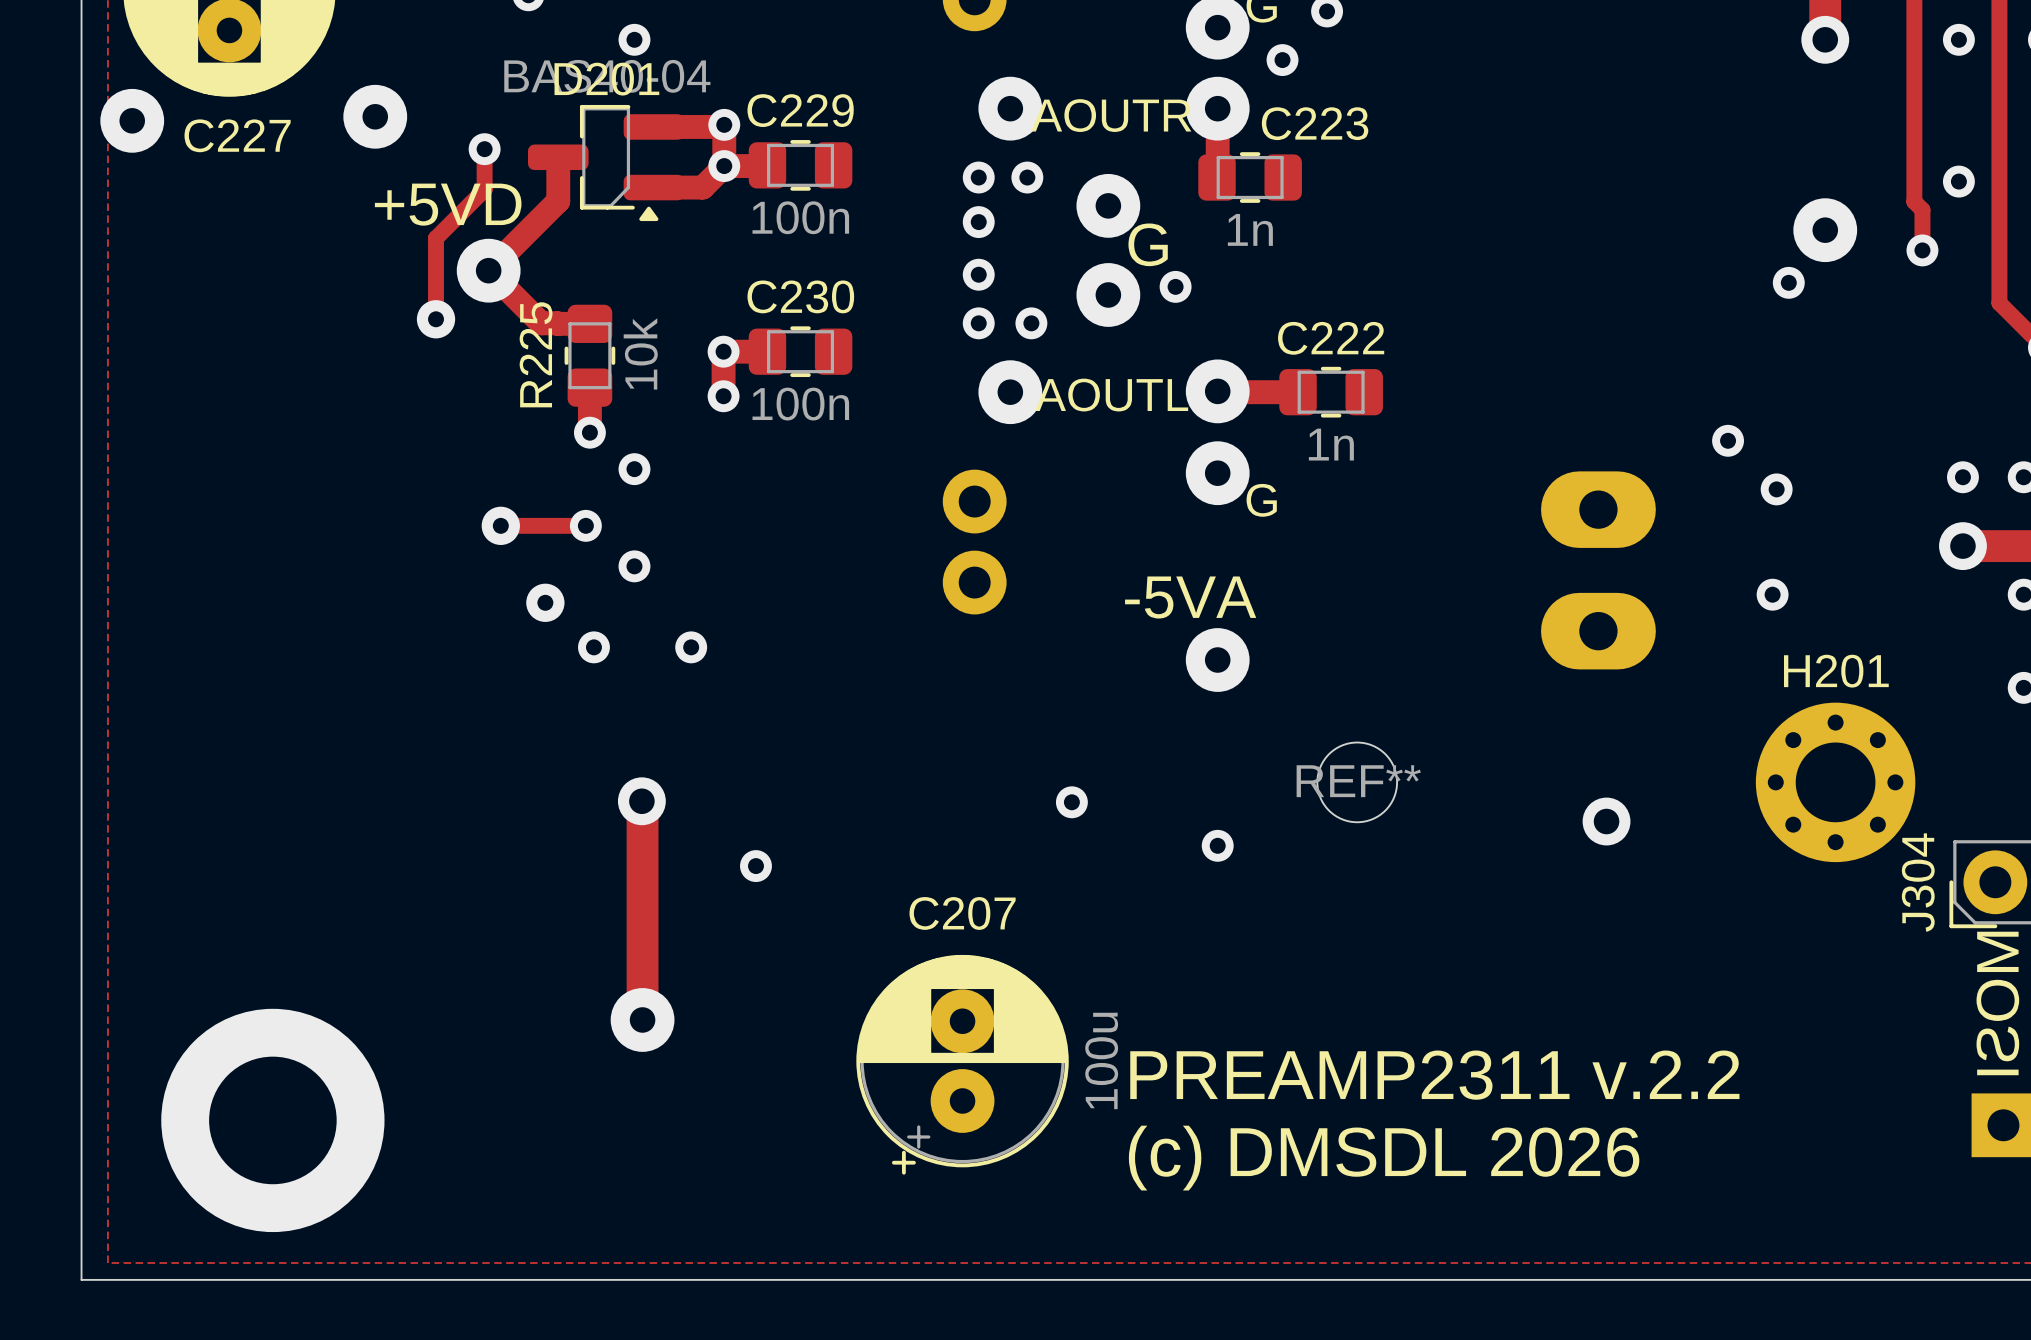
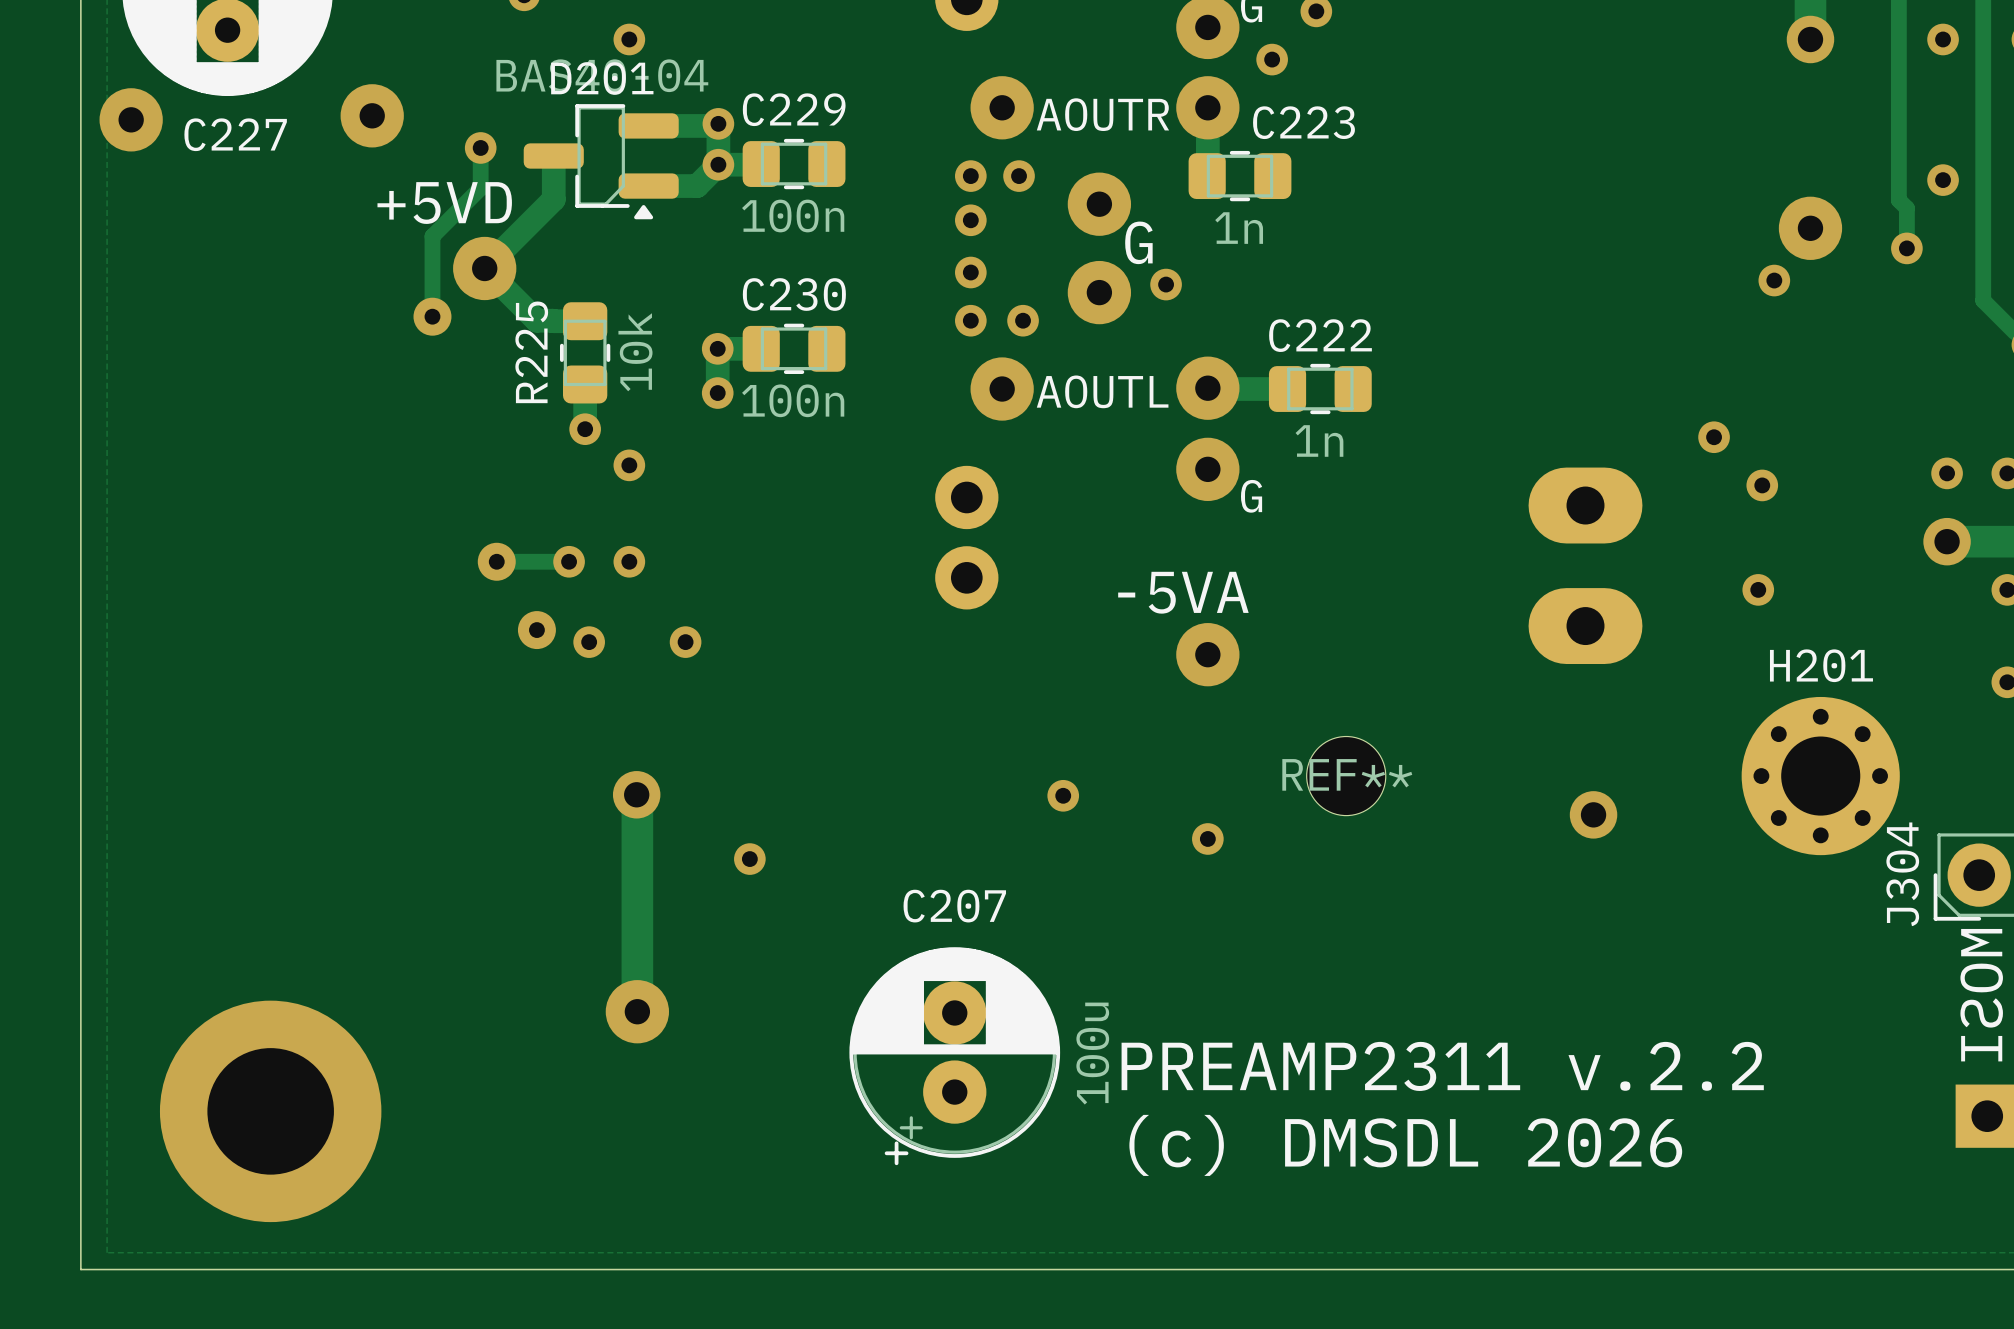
track: (500, 525) (585, 525) -> none
via: (500, 525) -> none
via position: (585, 525) -> (569, 561)
track: none -> (496, 561) (569, 561)
via: none -> (496, 561)
via: (545, 602) -> none
via: none -> (536, 630)

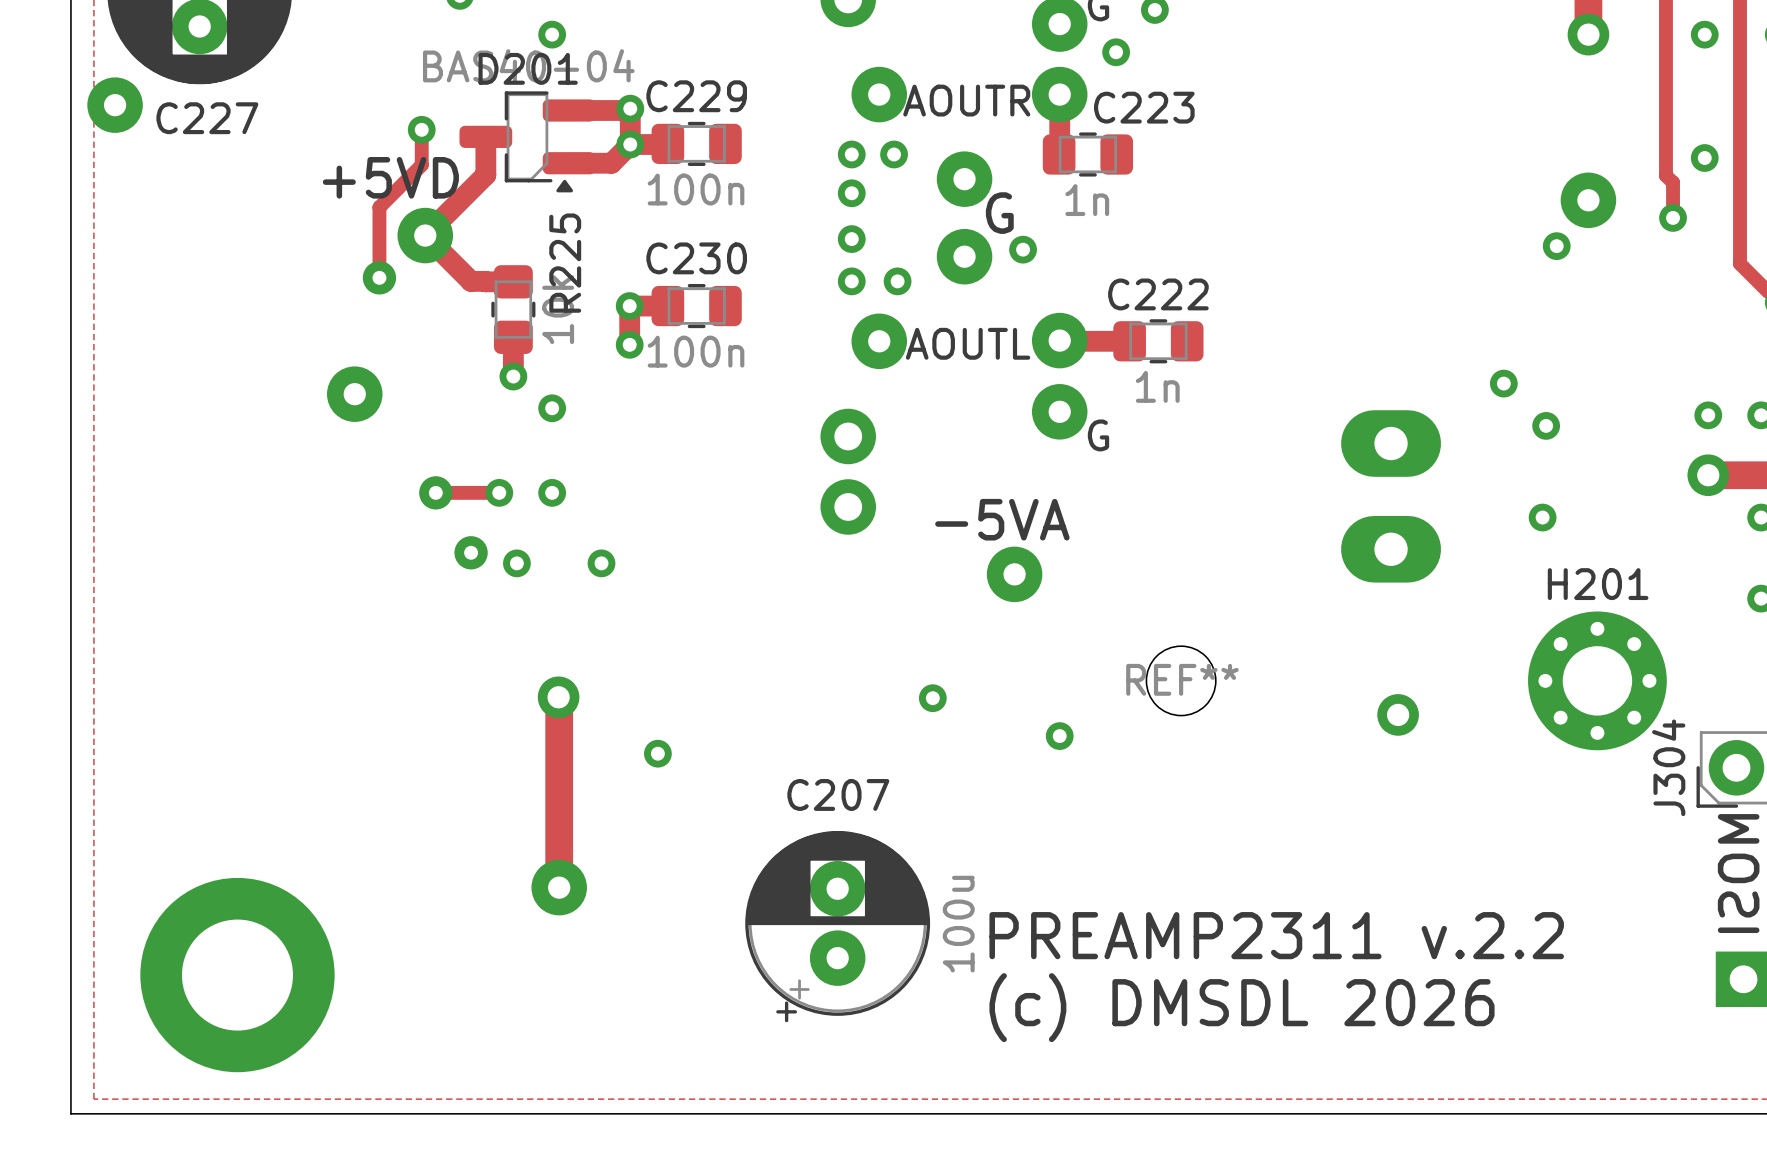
via: (372, 115) -> none
R225 name position: R225 (531, 352) -> R225 (565, 263)
via: none -> (354, 394)
text position: -5VA (1183, 592) -> -5VA (1002, 519)
via position: (1207, 654) -> (1014, 574)

